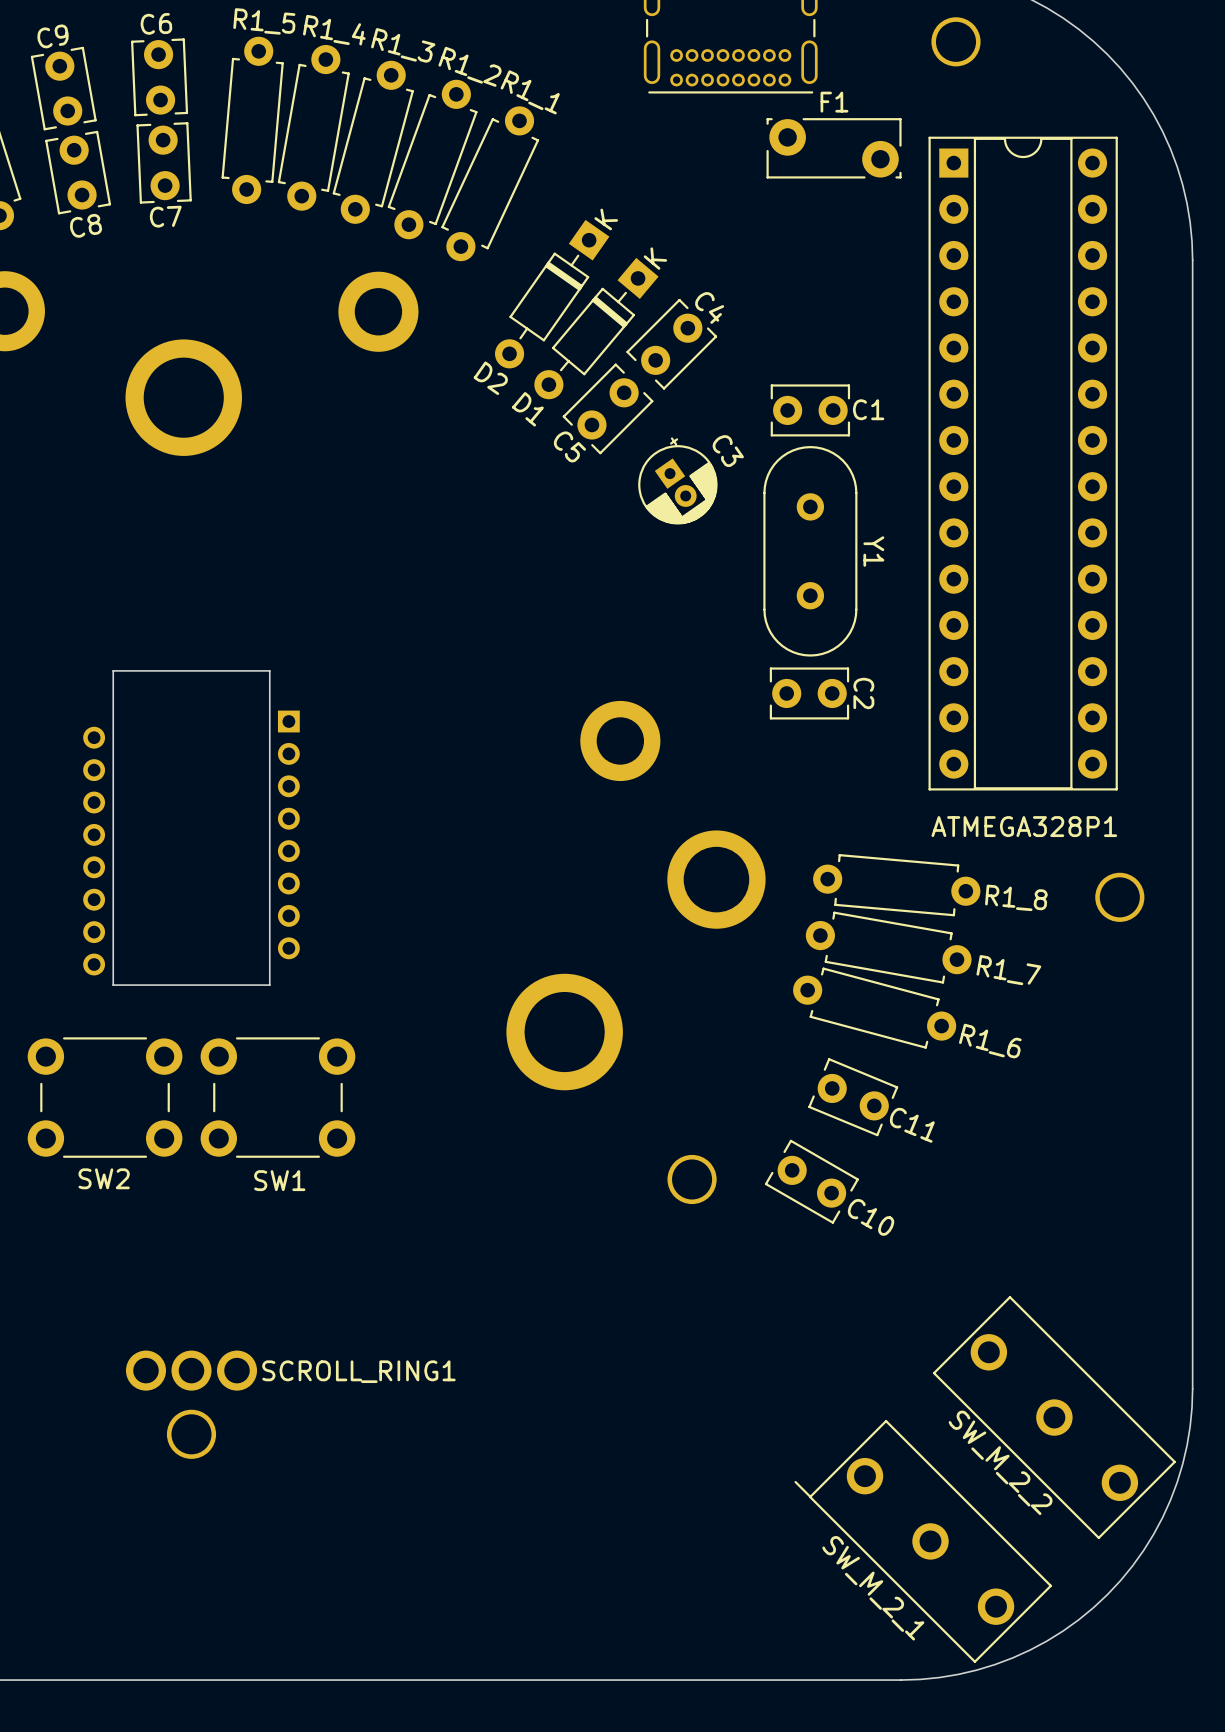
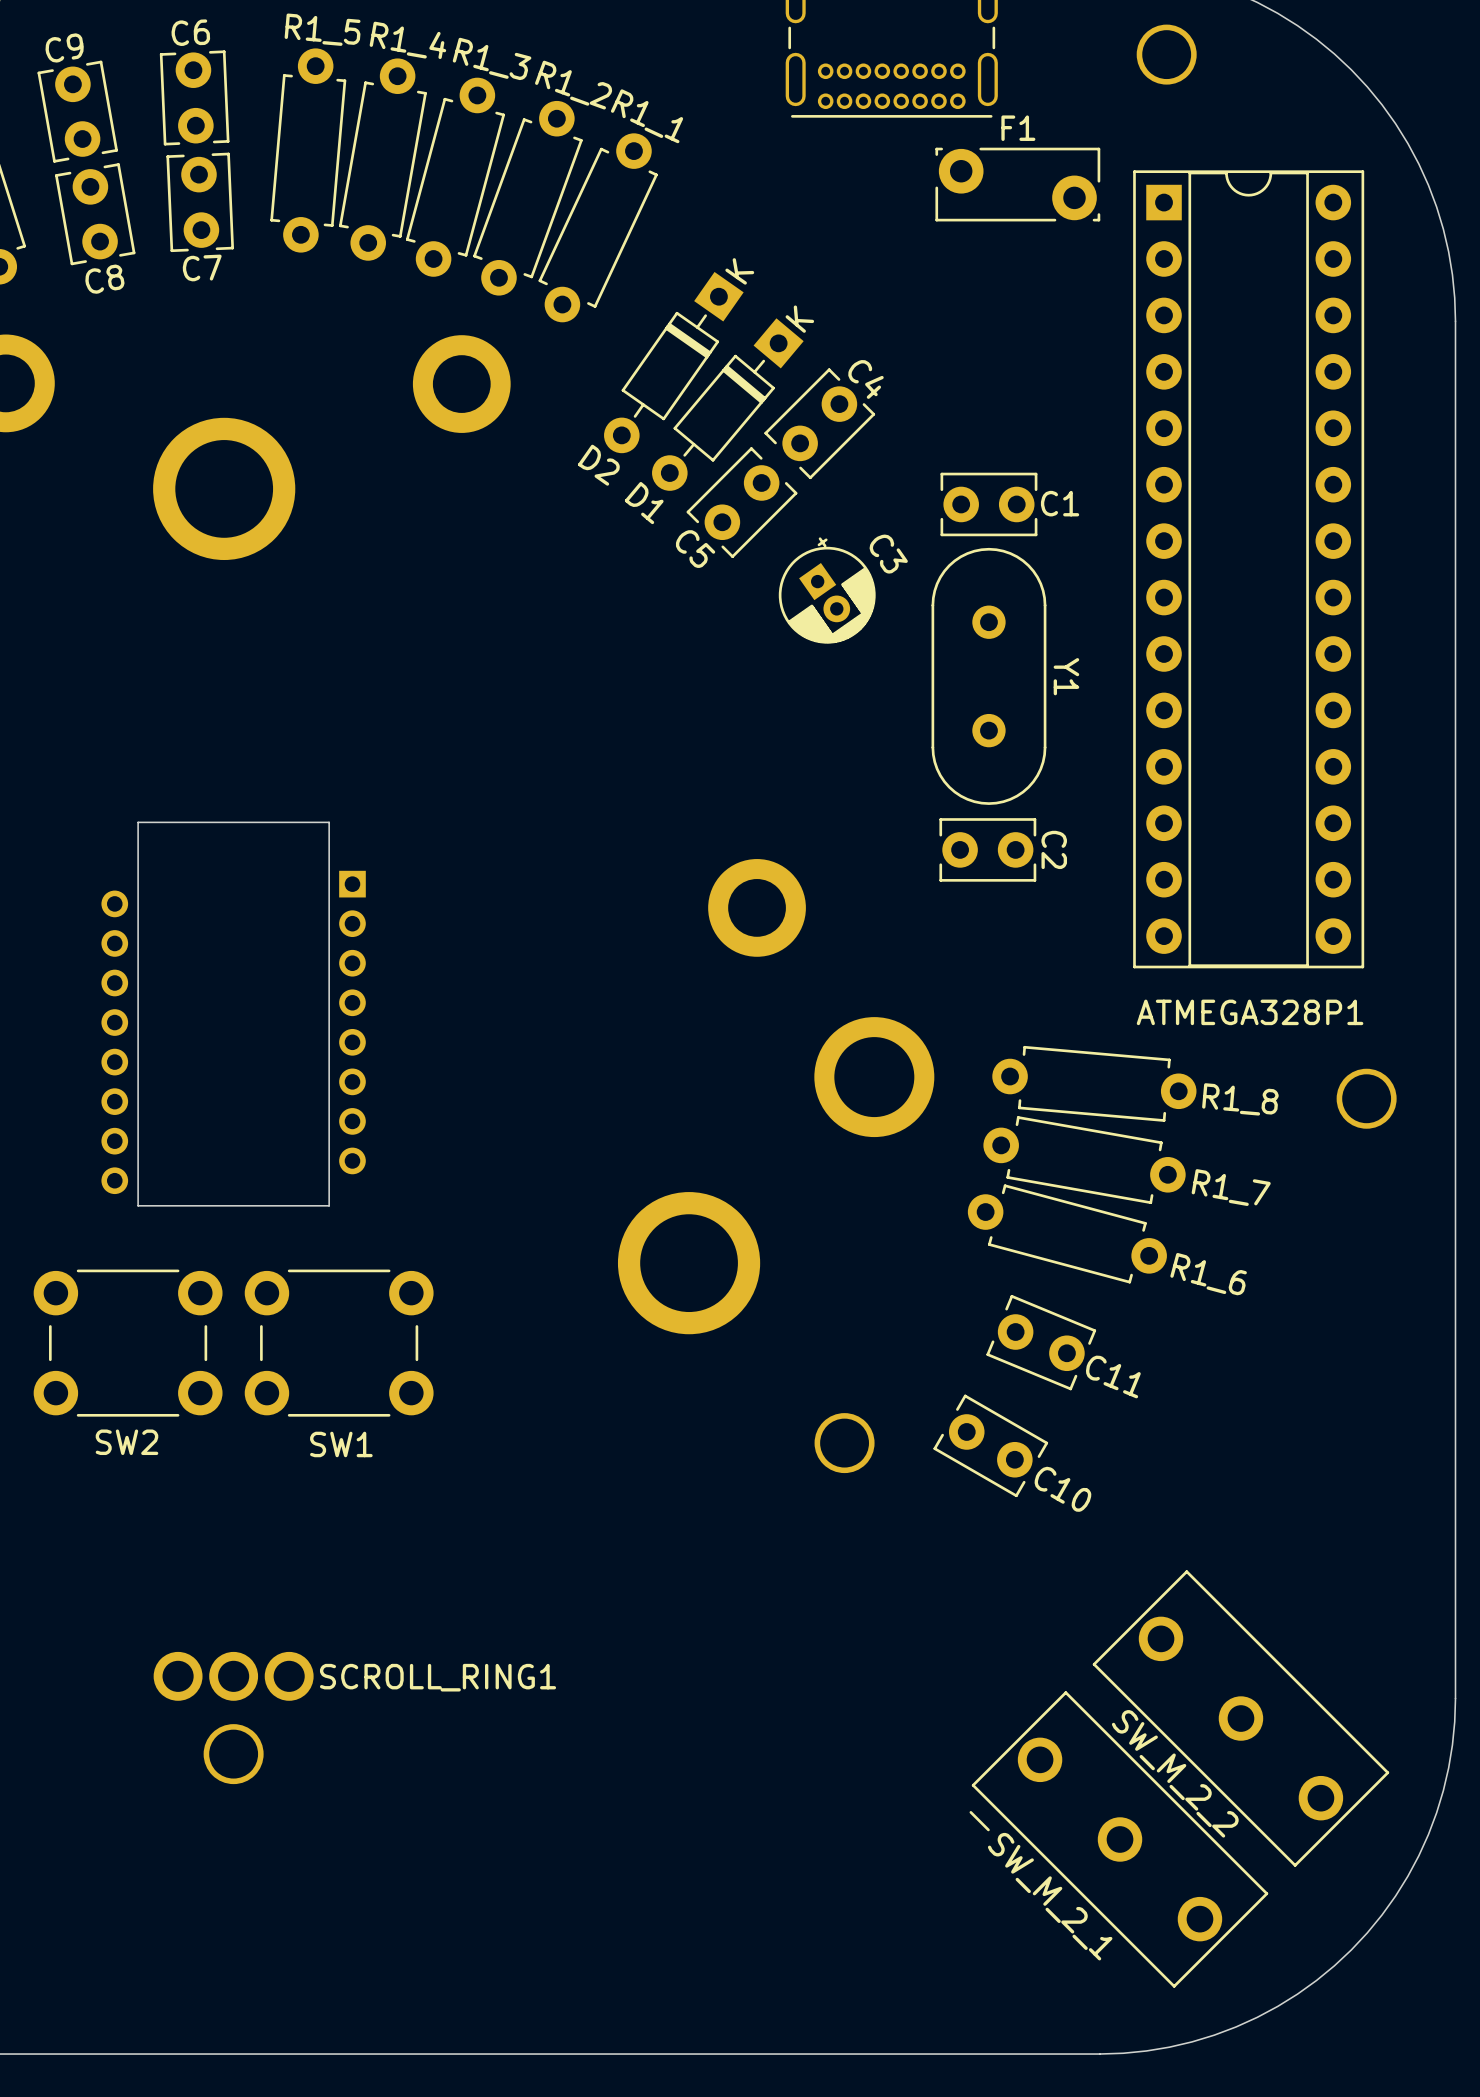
SW_M_2_2 position: (1054, 1417) -> (1240, 1718)
SW_M_2_1 position: (930, 1541) -> (1120, 1839)

